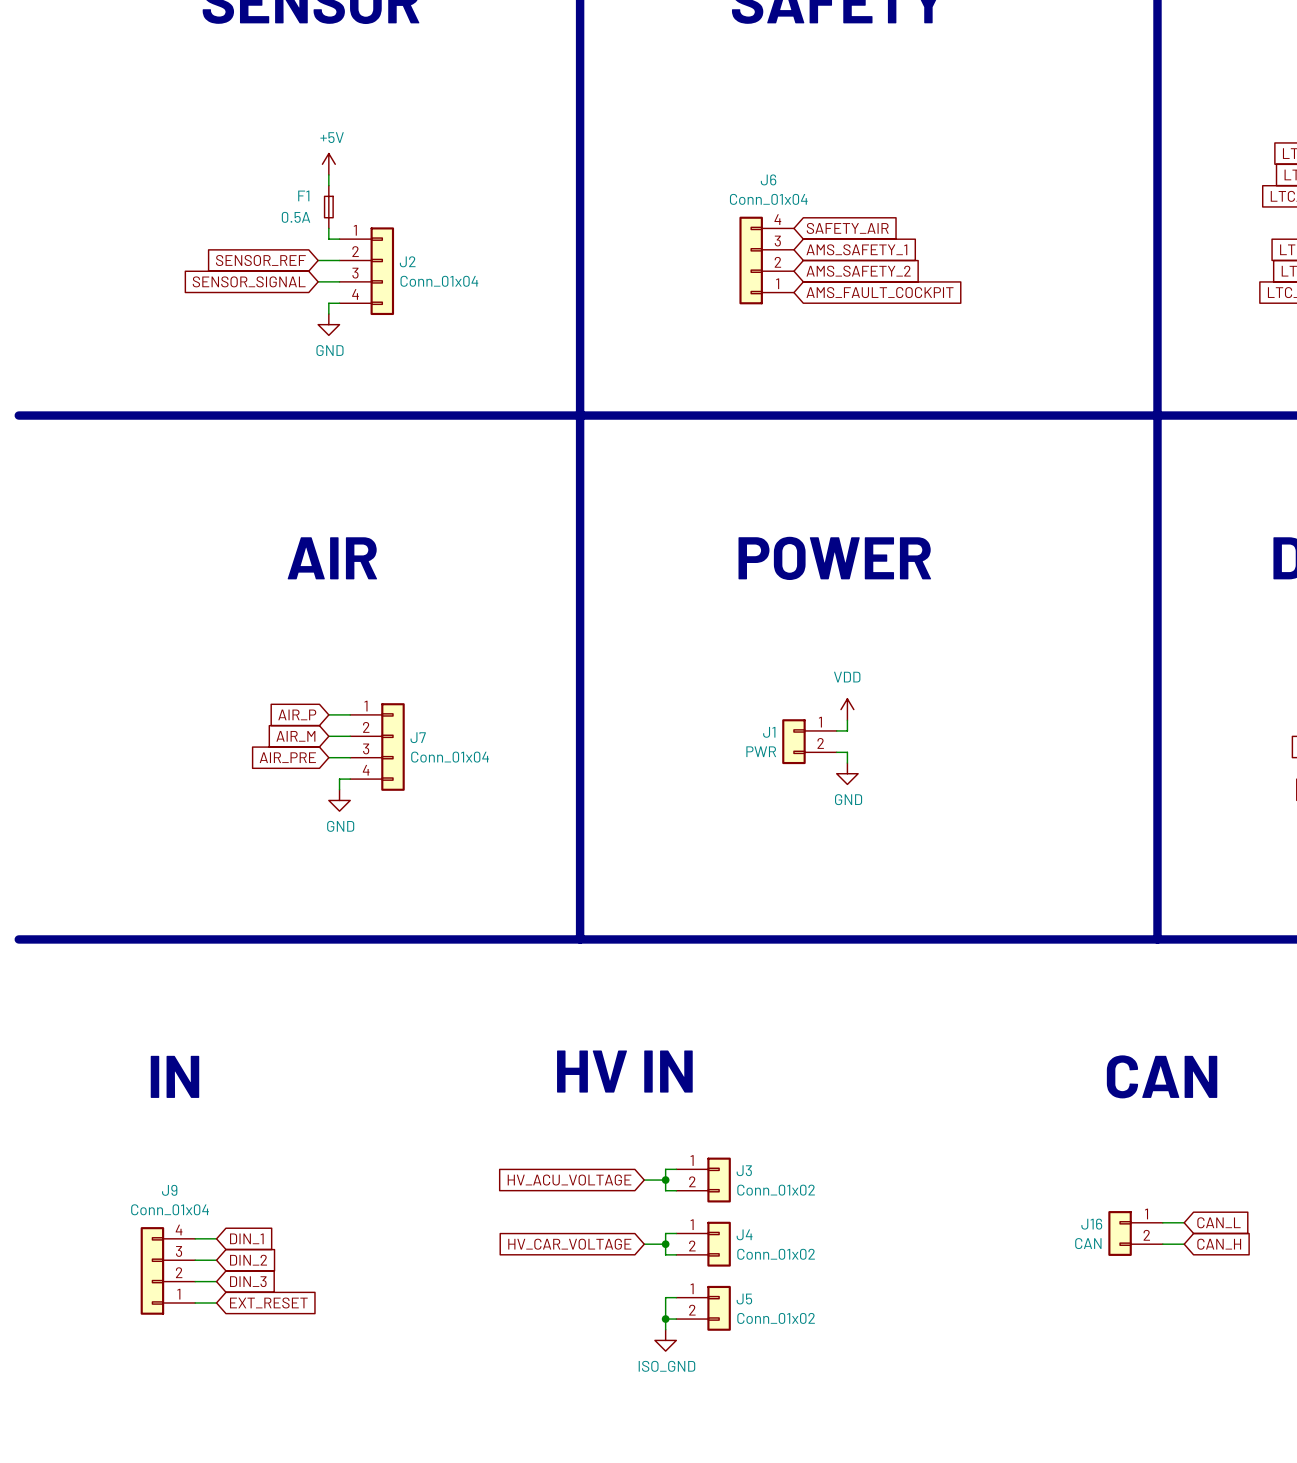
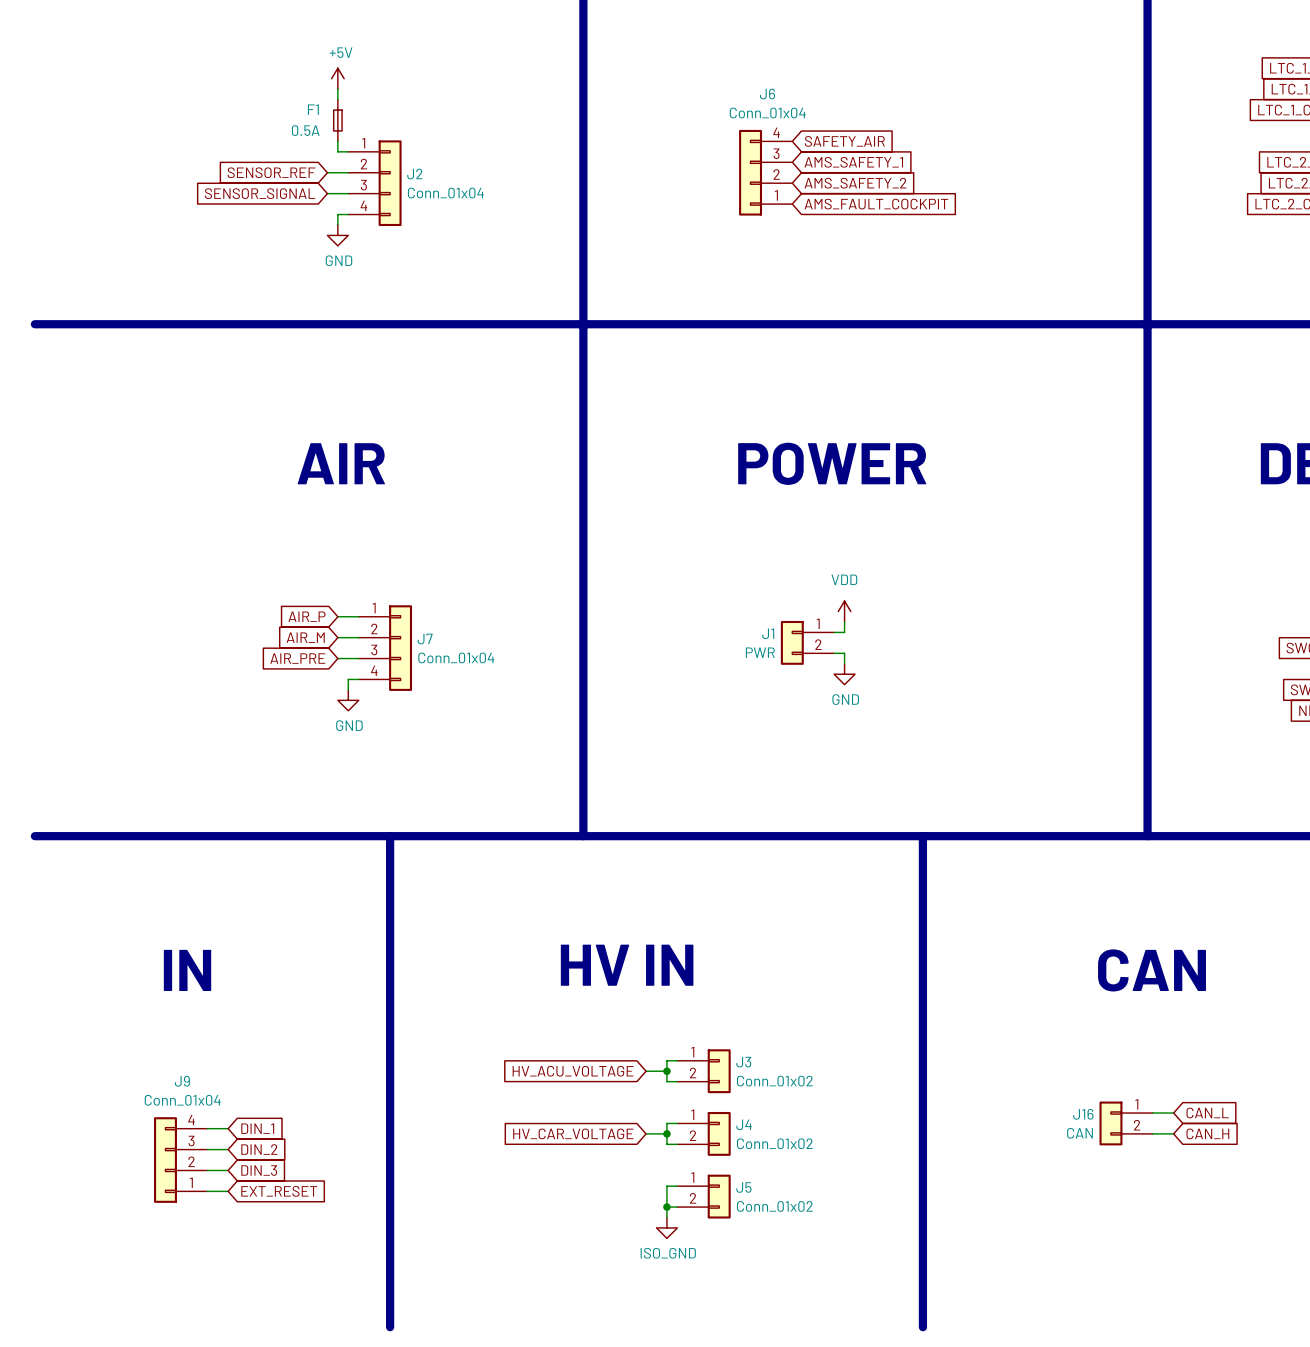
line: none -> (390, 836) (390, 1327)
line: none -> (922, 836) (922, 1327)

